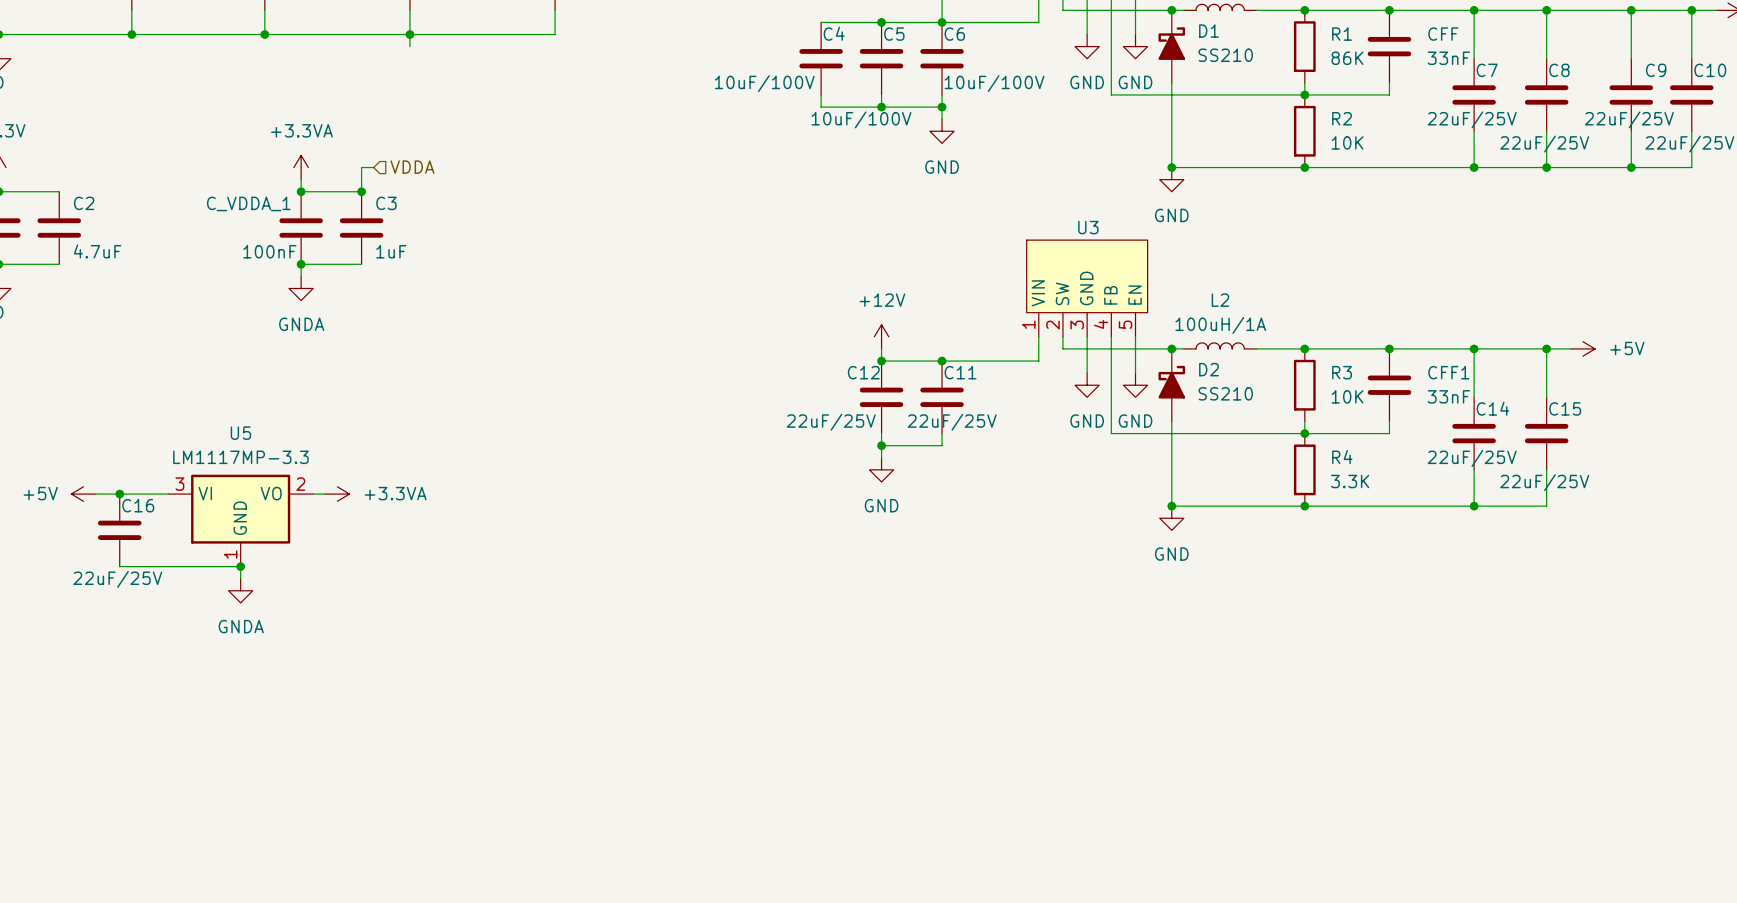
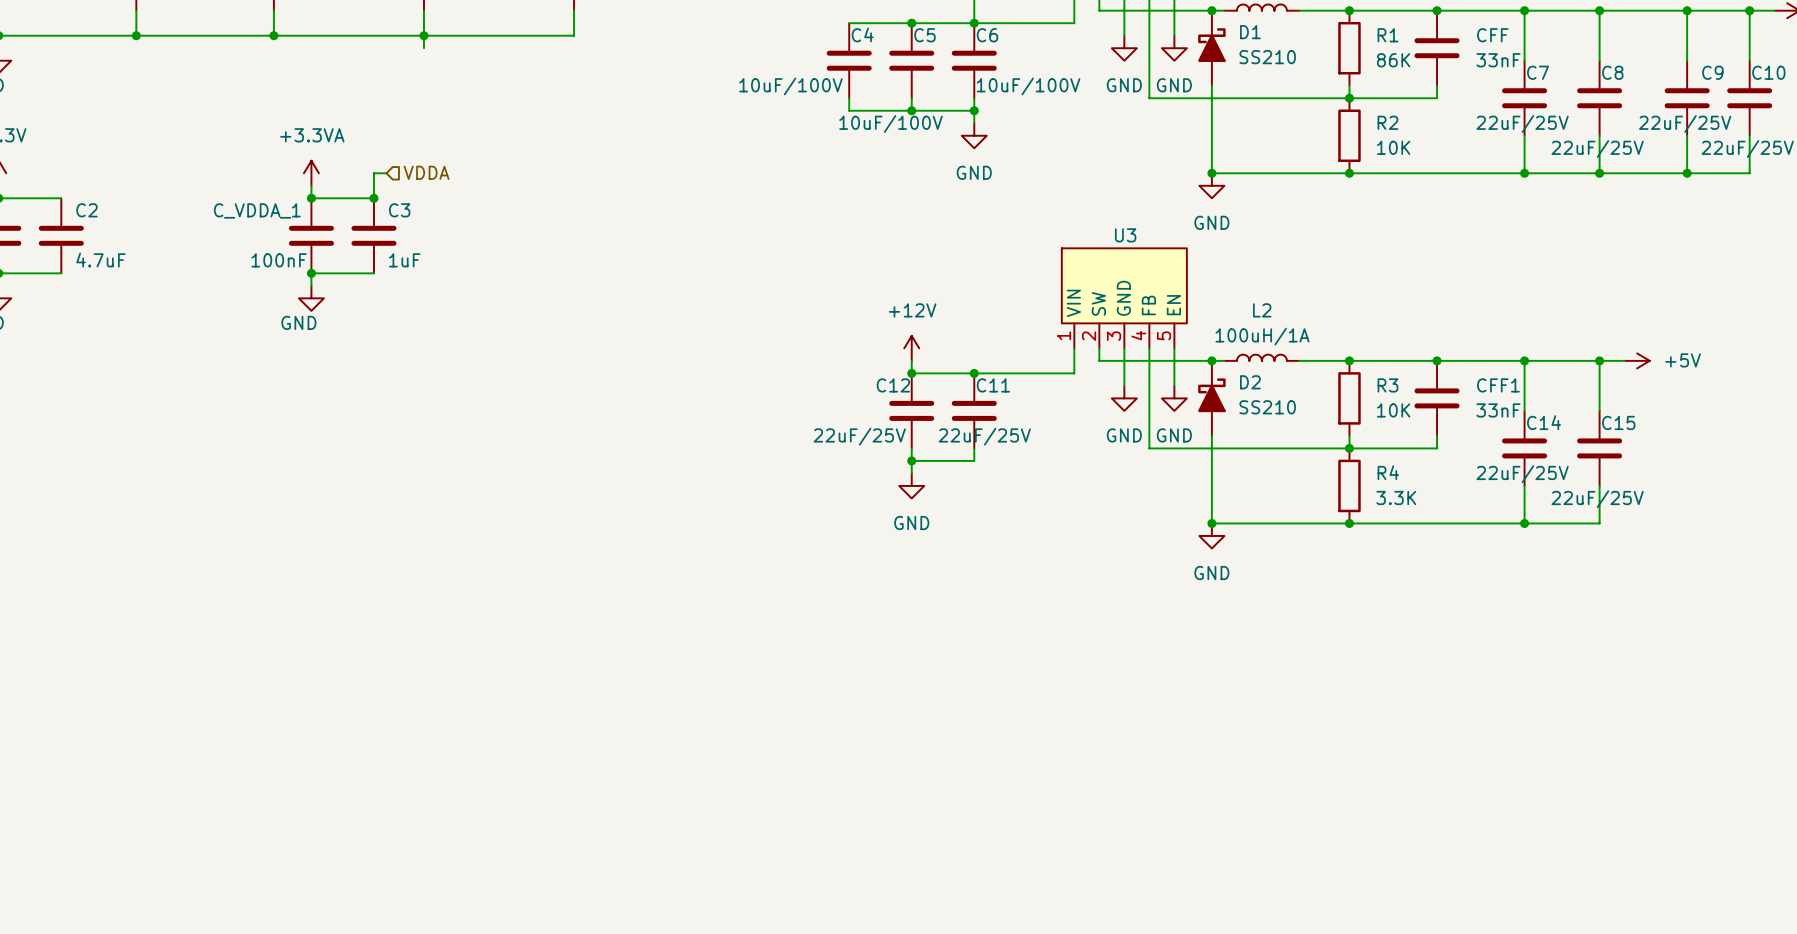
power symbol: GNDA (301, 288) -> GND (311, 298)
power symbol: +5V (83, 494) -> none
wire: (95, 494) (168, 494) -> none
junction: (119, 494) -> none
wire: (313, 494) (325, 494) -> none
power symbol: +3.3VA (337, 494) -> none
U5: LM1117MP-3.3 (240, 520) -> none
C16: 22uF/25V (119, 530) -> none
wire: (119, 566) (240, 566) (240, 578) -> none
junction: (240, 566) -> none
power symbol: GNDA (240, 590) -> none

